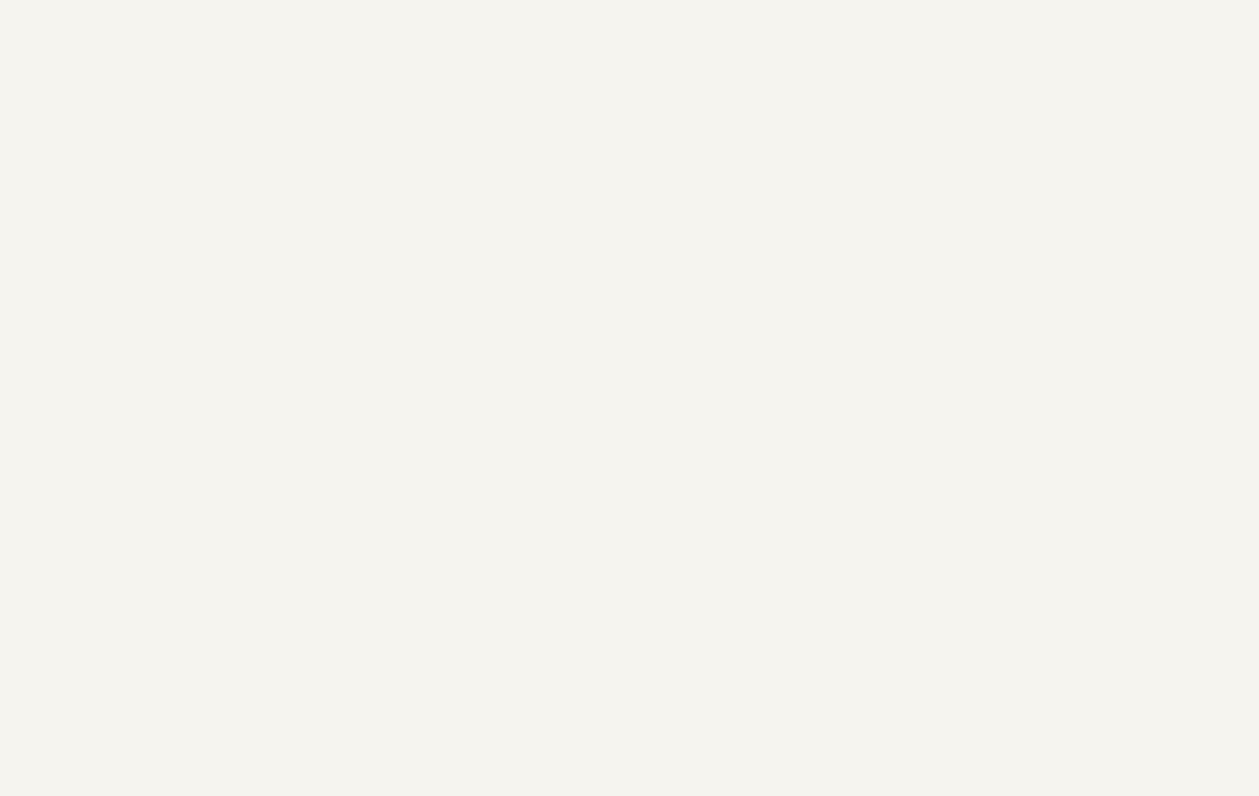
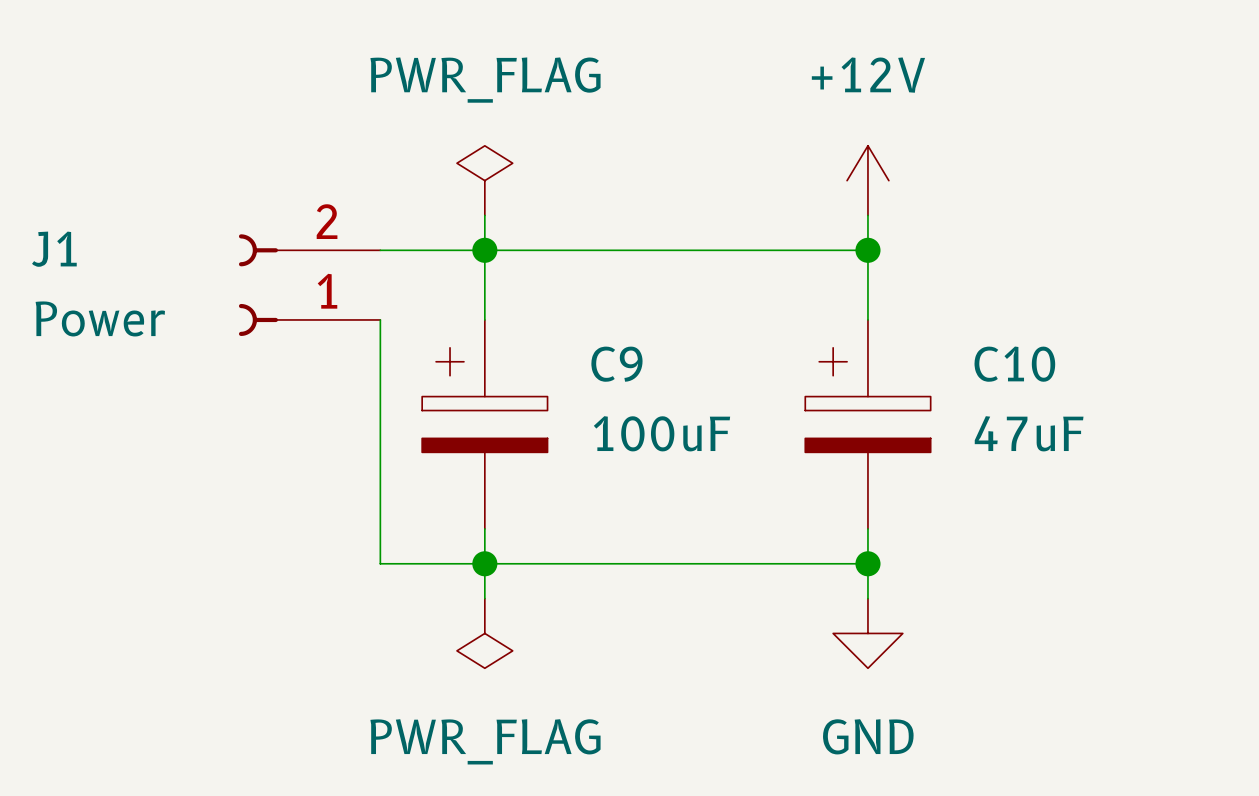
power symbol: none -> PWR_FLAG (484, 180)
power symbol: none -> +12V (867, 180)
wire: none -> (484, 215) (484, 319)
wire: none -> (867, 215) (867, 319)
wire: none -> (380, 250) (867, 250)
junction: none -> (484, 250)
junction: none -> (867, 250)
J1: none -> Power (309, 285)
wire: none -> (380, 319) (380, 563) (867, 563)
C9: none -> 100uF (484, 424)
C10: none -> 47uF (867, 424)
wire: none -> (484, 528) (484, 598)
wire: none -> (867, 528) (867, 598)
junction: none -> (484, 563)
junction: none -> (867, 563)
power symbol: none -> PWR_FLAG (484, 633)
power symbol: none -> GND (867, 633)

